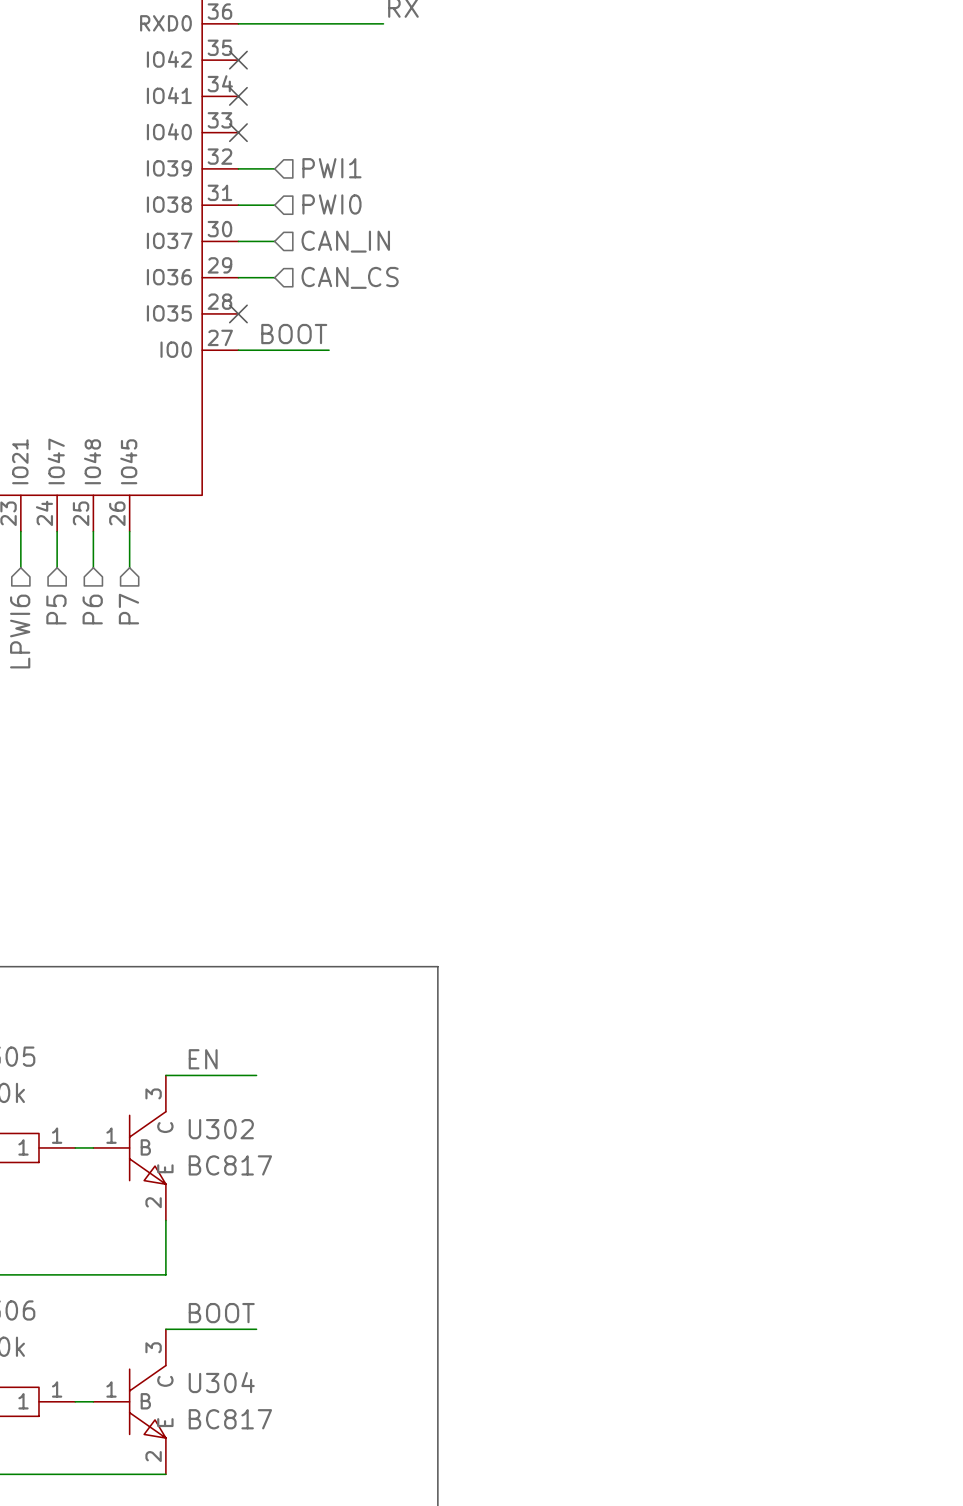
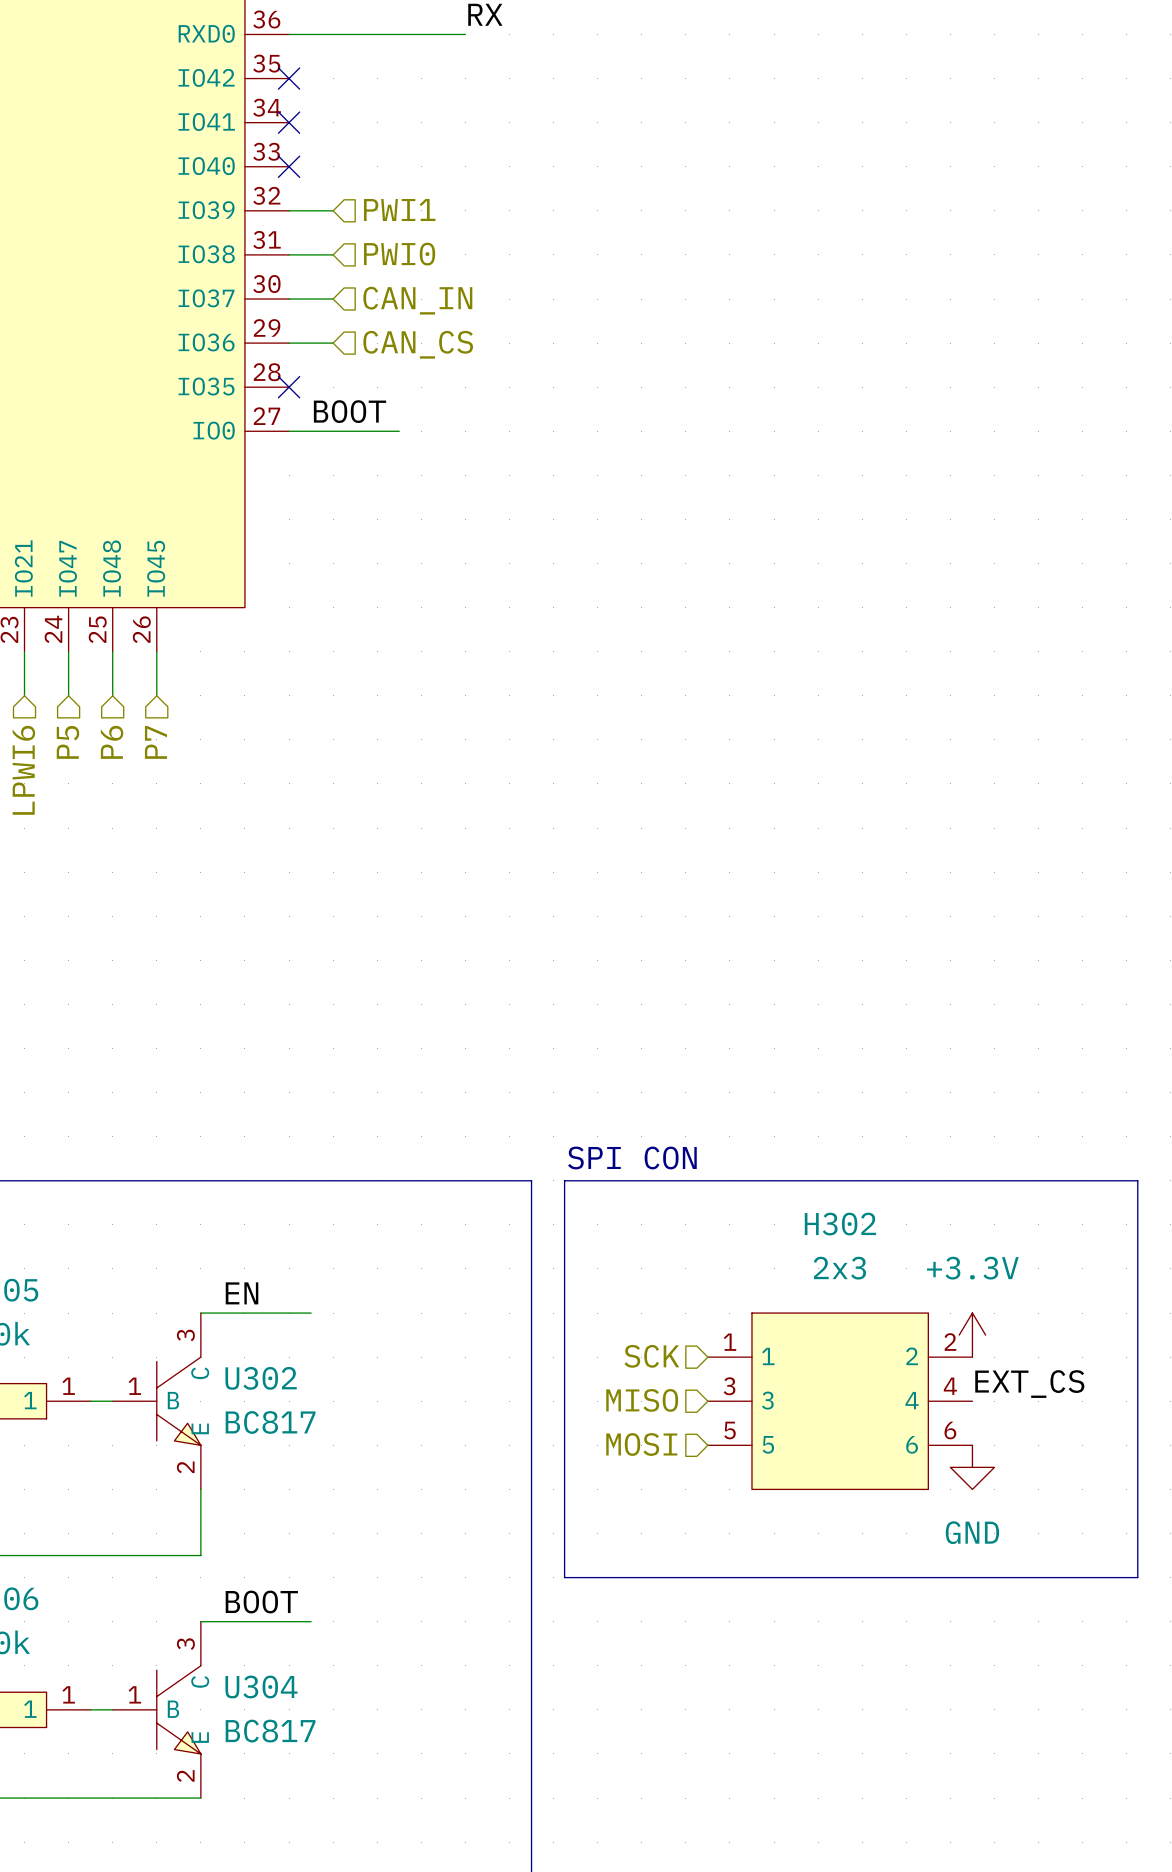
text: none -> SPI CON (632, 1157)
line: none -> (564, 1180) (1137, 1180) (1137, 1577) (564, 1577) (564, 1180)
power symbol: none -> +3.3V (972, 1335)
hierarchical label: none -> SCK (651, 1356)
label: none -> EXT_CS (1029, 1384)
hierarchical label: none -> MISO (642, 1400)
H302: none -> 2x3 (840, 1401)
hierarchical label: none -> MOSI (641, 1444)
power symbol: none -> GND (972, 1467)

